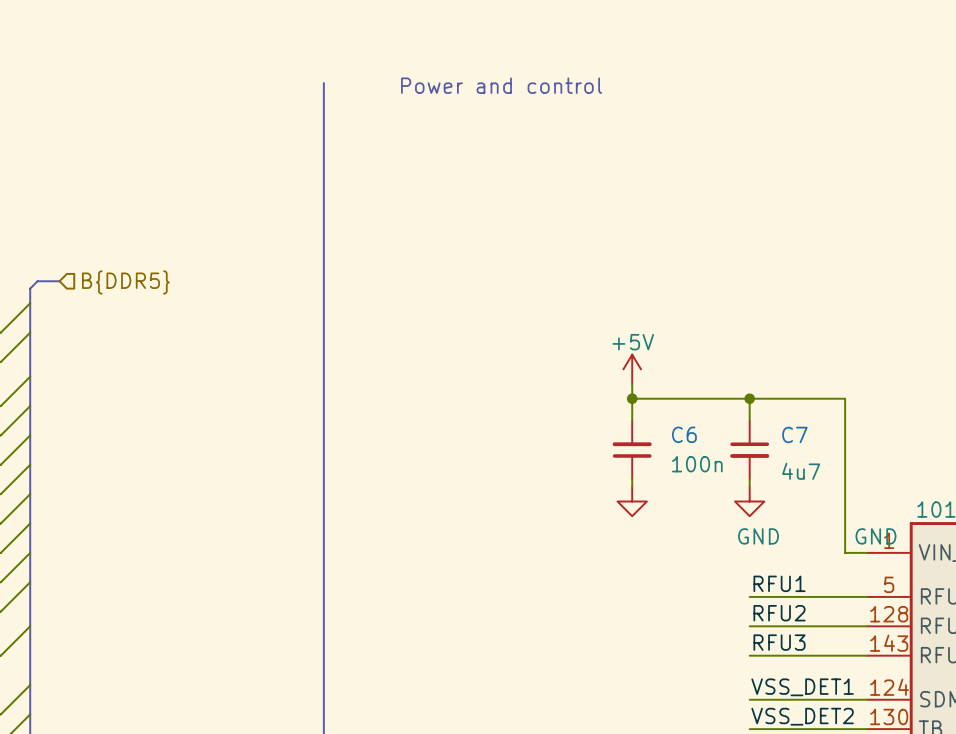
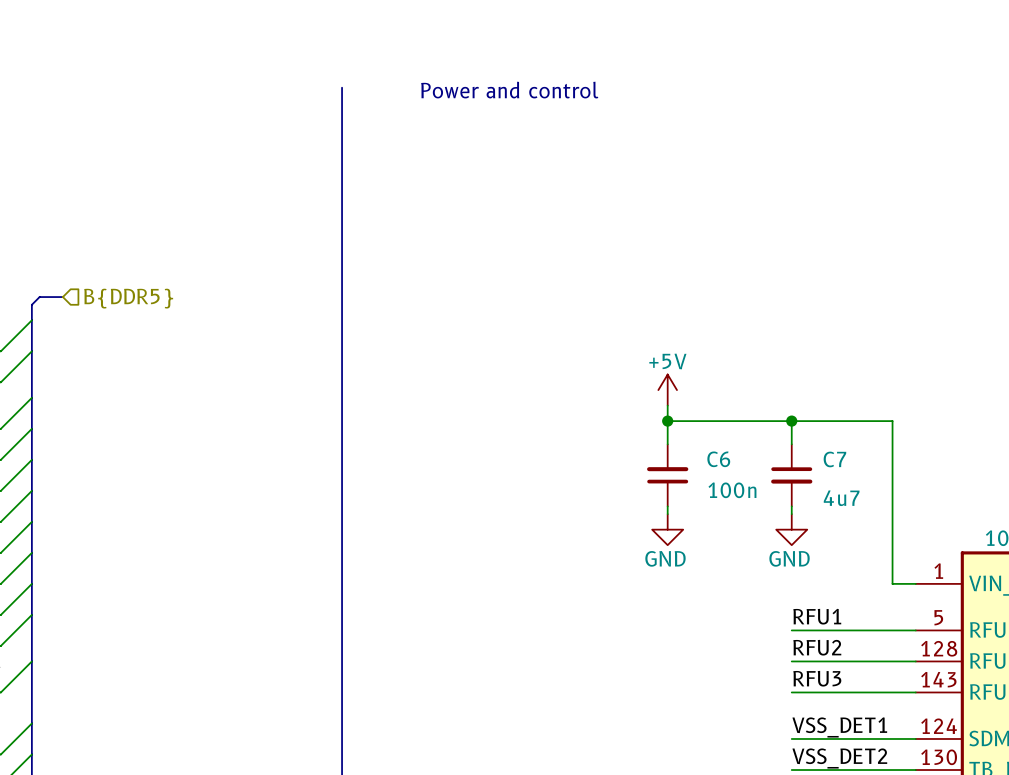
power symbol text position: GND (758, 536) -> GND (665, 558)
power symbol text position: GND (875, 536) -> GND (789, 558)

